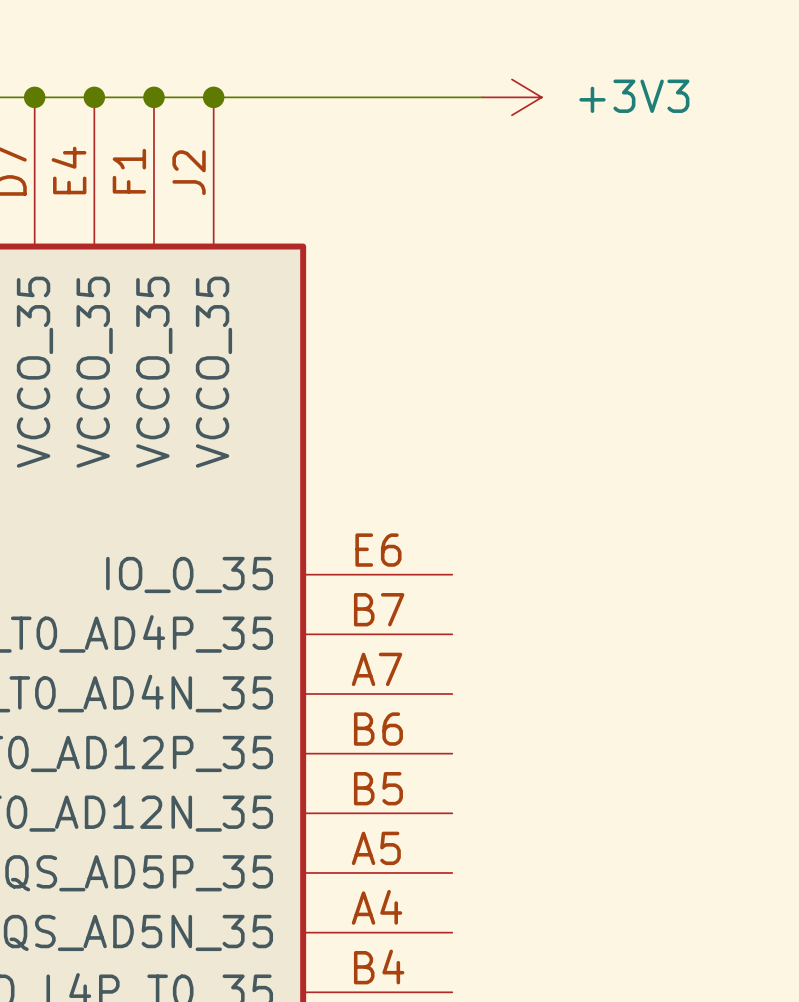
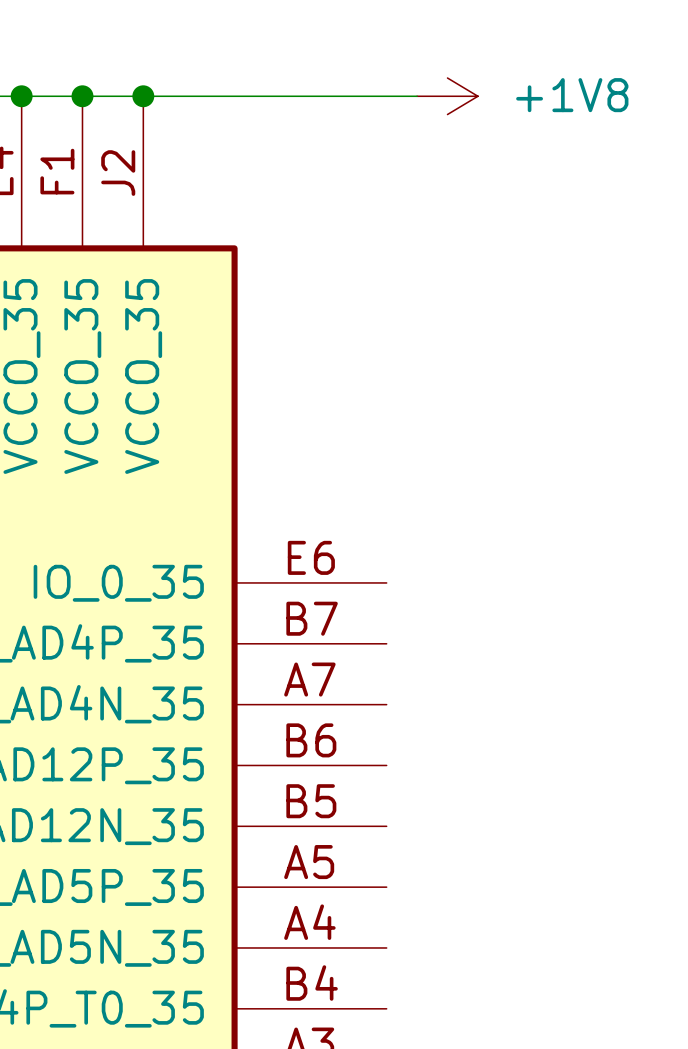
power symbol: +3V3 (511, 97) -> +1V8 (447, 96)

